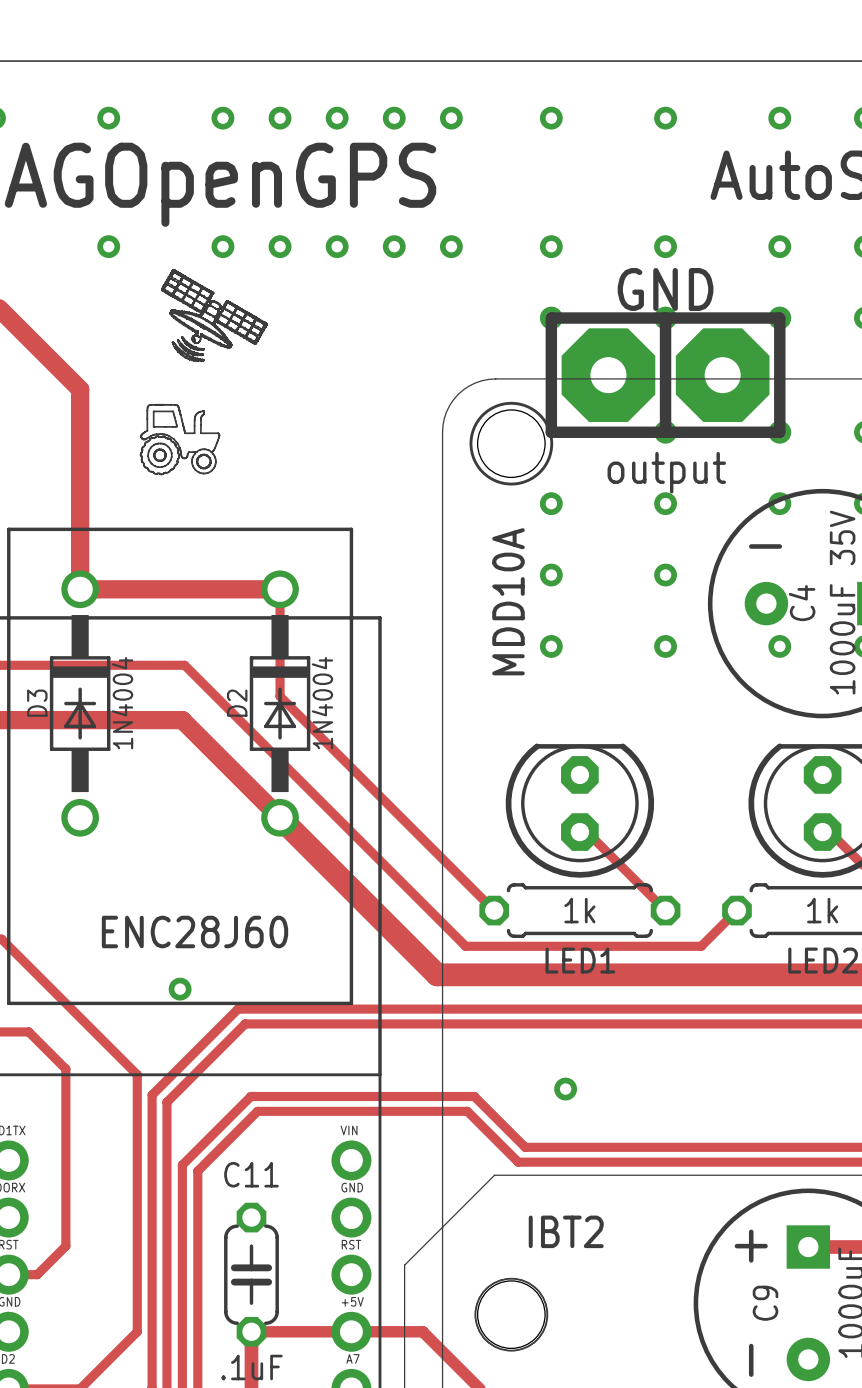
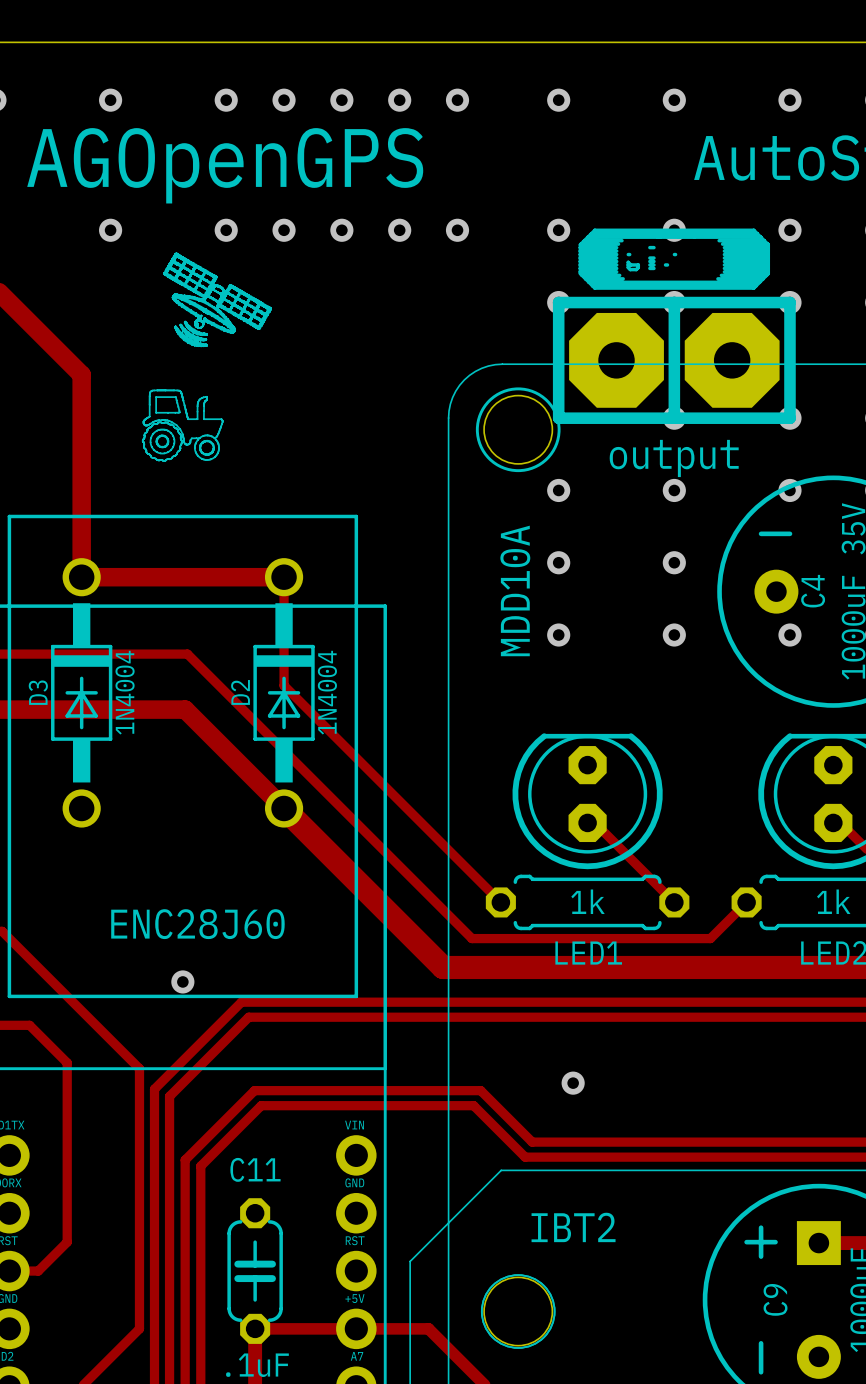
line: none -> (594, 230) (580, 244) (580, 273) (594, 288) (753, 288) (768, 273) (768, 244) (753, 230) (594, 230)
line: none -> (591, 233) (757, 233)
line: none -> (587, 237) (760, 237)
line: none -> (584, 240) (621, 240)
line: none -> (719, 240) (764, 240)
line: none -> (580, 244) (618, 244)
line: none -> (722, 244) (767, 244)
line: none -> (580, 247) (616, 247)
line: none -> (649, 247) (653, 247)
line: none -> (724, 247) (768, 247)
line: none -> (580, 251) (616, 251)
line: none -> (724, 251) (768, 251)
line: none -> (580, 254) (616, 254)
line: none -> (628, 254) (629, 254)
line: none -> (674, 254) (675, 254)
line: none -> (724, 254) (768, 254)
line: none -> (580, 258) (616, 258)
line: none -> (649, 258) (653, 258)
line: none -> (724, 258) (768, 258)
line: none -> (580, 261) (616, 261)
line: none -> (649, 261) (653, 261)
line: none -> (724, 261) (768, 261)
line: none -> (580, 264) (616, 264)
line: none -> (628, 264) (638, 264) (638, 267) (630, 269) (628, 267) (628, 262) (630, 264)
line: none -> (649, 264) (653, 264)
line: none -> (665, 264) (667, 264)
line: none -> (724, 264) (768, 264)
line: none -> (580, 268) (616, 268)
line: none -> (649, 268) (653, 268)
line: none -> (724, 268) (768, 268)
line: none -> (580, 271) (616, 271)
line: none -> (724, 271) (768, 271)
text: GND (665, 289) -> none
line: none -> (582, 275) (619, 275)
line: none -> (721, 275) (766, 275)
line: none -> (585, 278) (623, 278)
line: none -> (717, 278) (763, 278)
line: none -> (589, 282) (759, 282)
line: none -> (592, 285) (756, 285)

